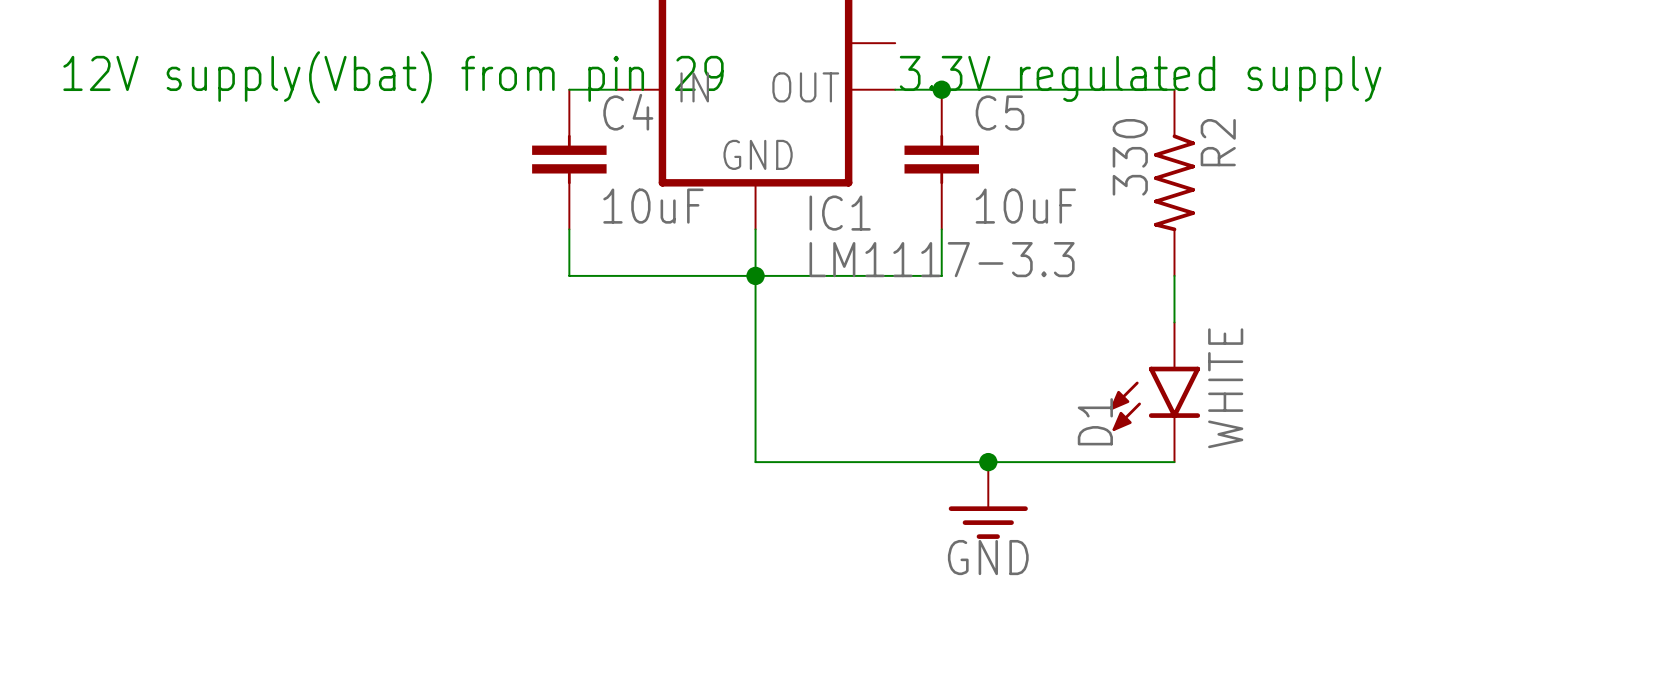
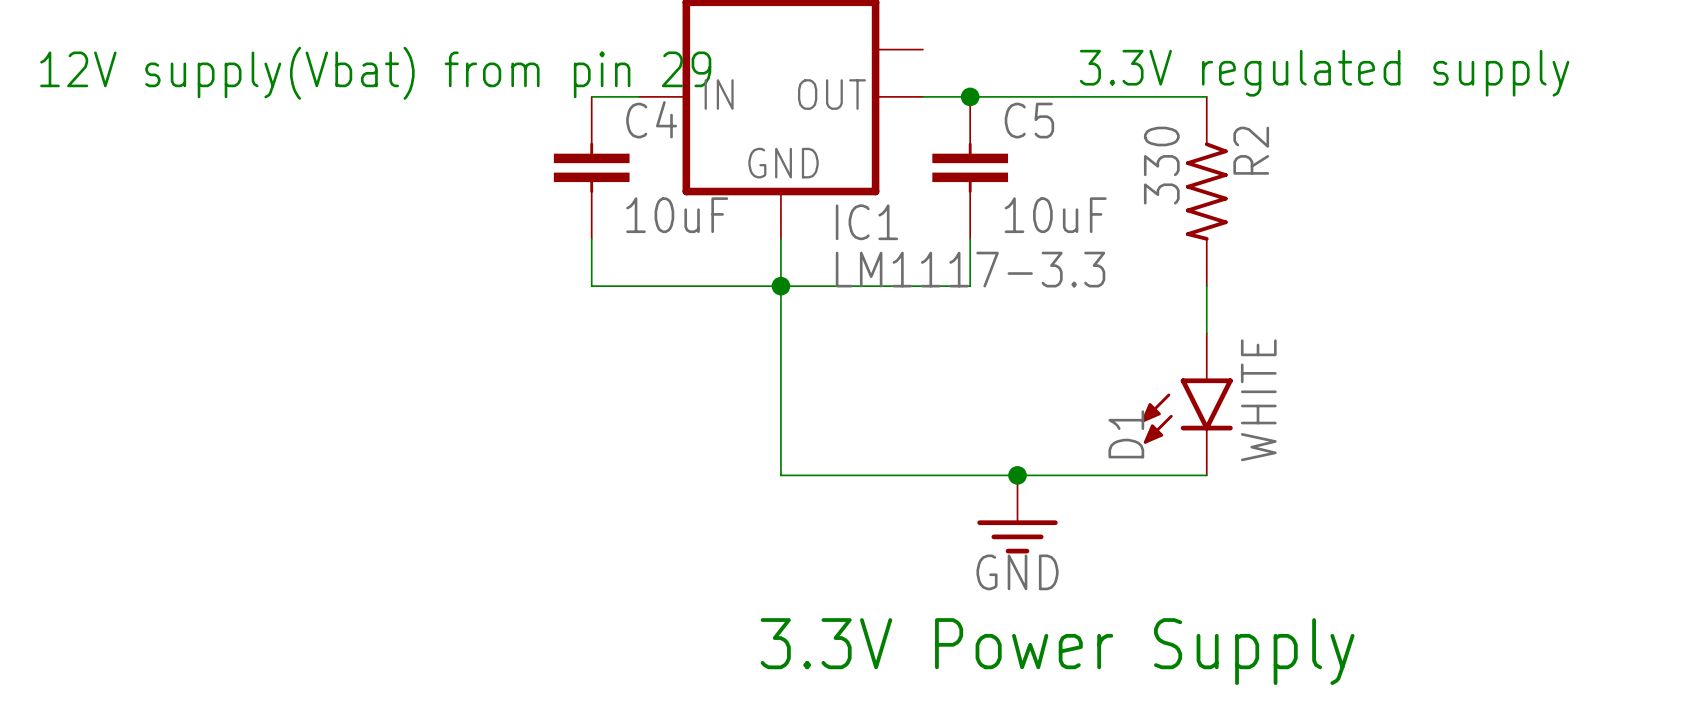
text position: 12V supply(Vbat) from pin 29 (393, 77) -> 12V supply(Vbat) from pin 29 (375, 73)
text position: 3.3V regulated supply (1140, 78) -> 3.3V regulated supply (1324, 73)
text: none -> 3.3V Power Supply (1057, 651)

